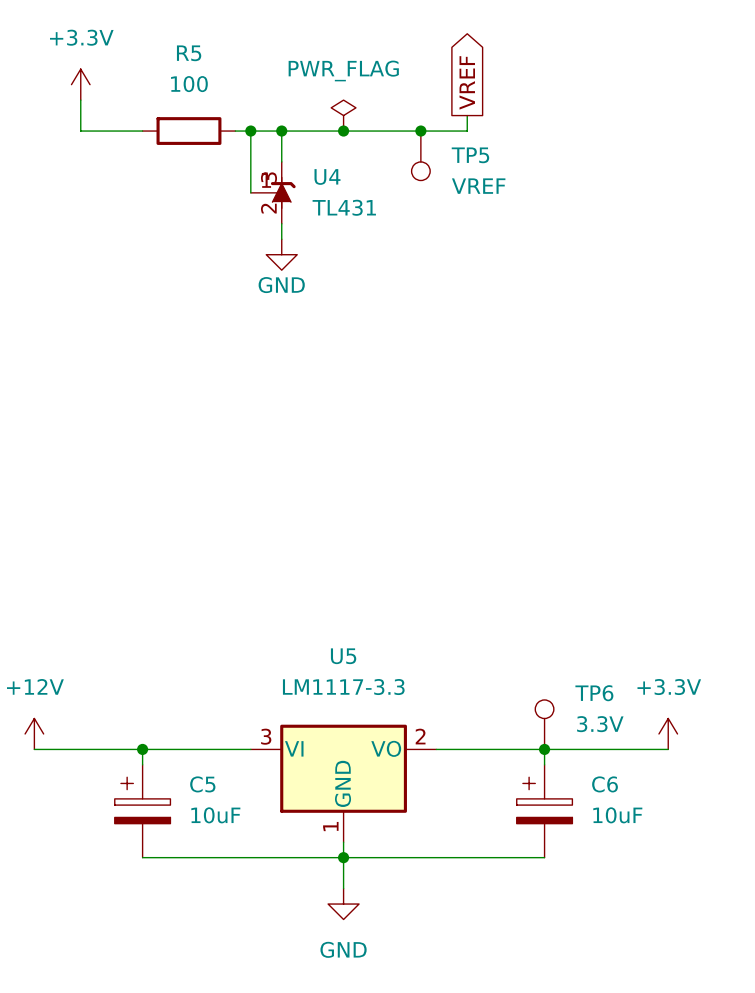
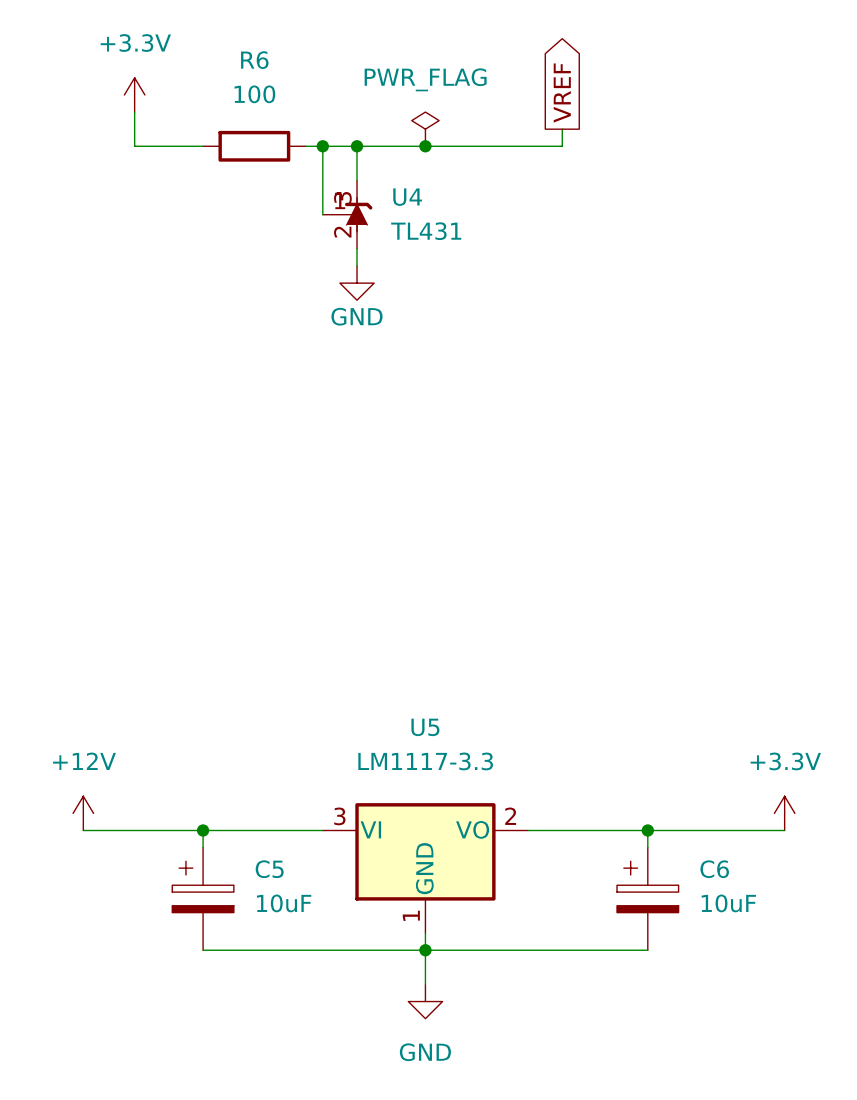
R5 name: R5 (189, 53) -> R6 (254, 60)
junction: (420, 131) -> none
TP5: VREF (420, 155) -> none
TP6: 3.3V (544, 724) -> none

